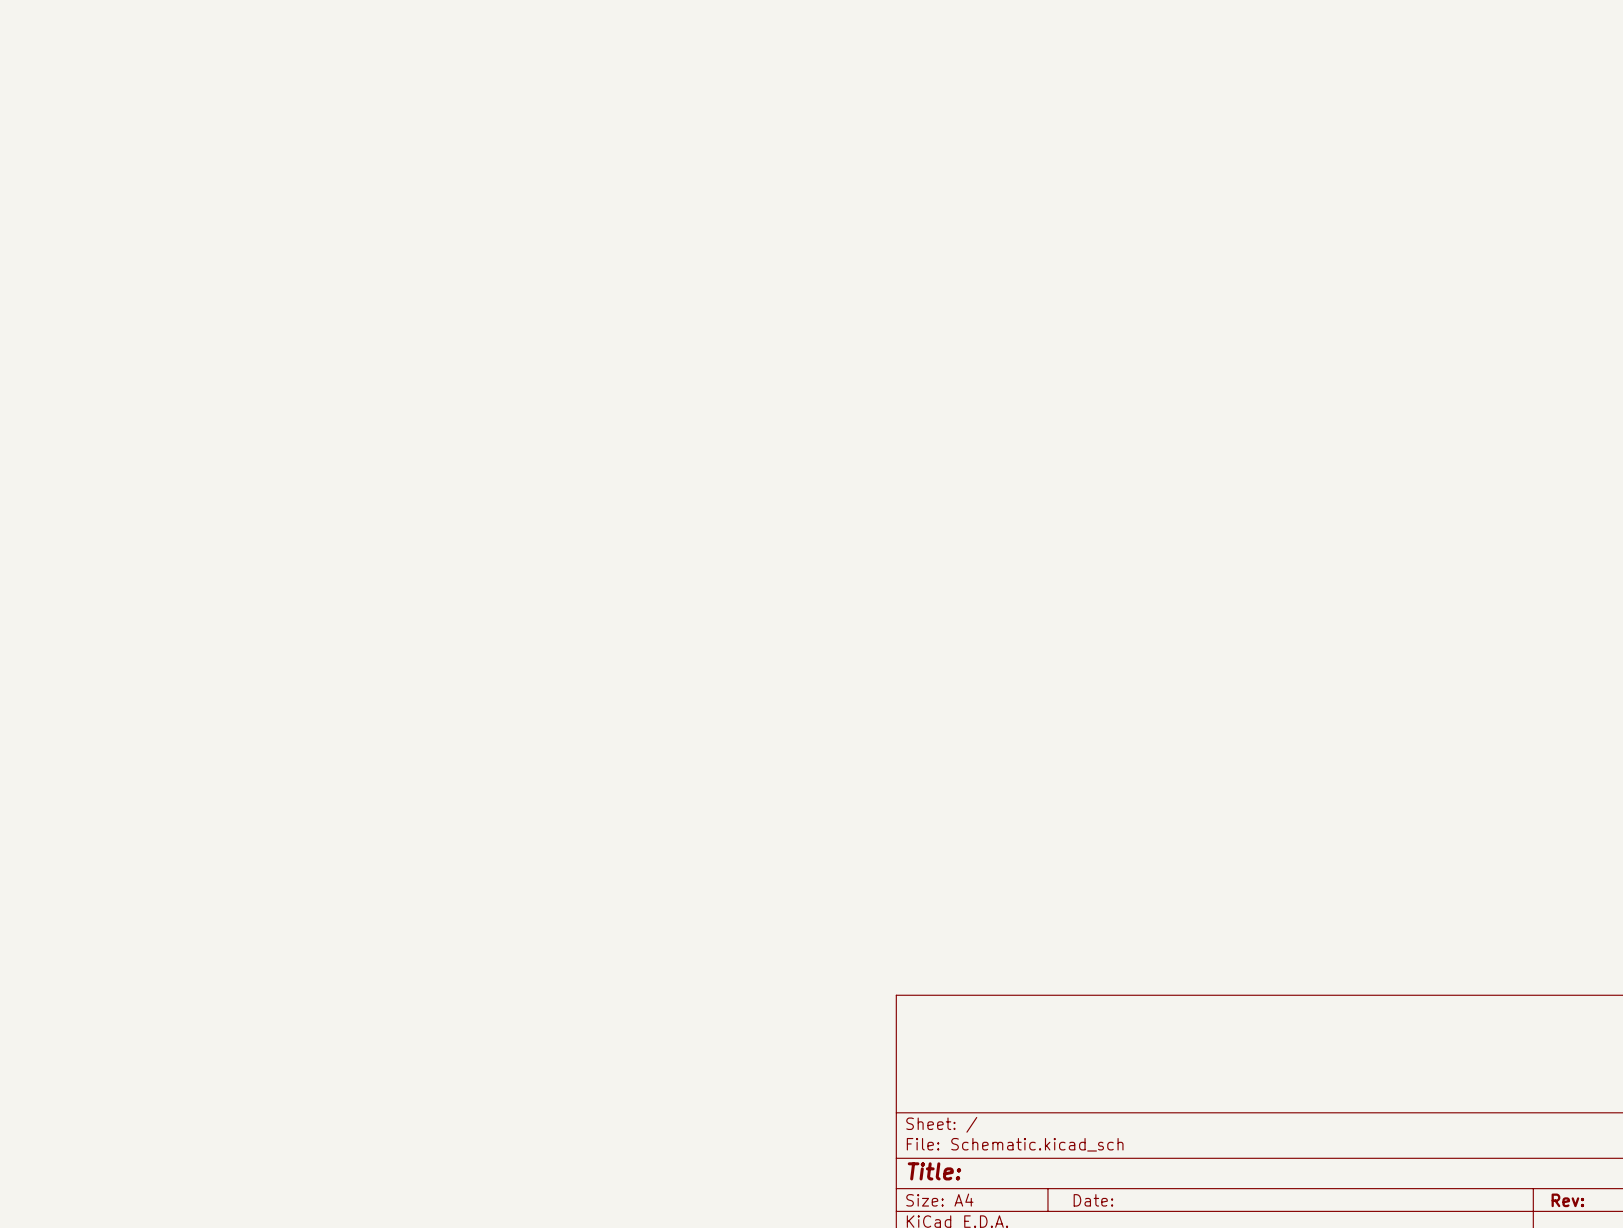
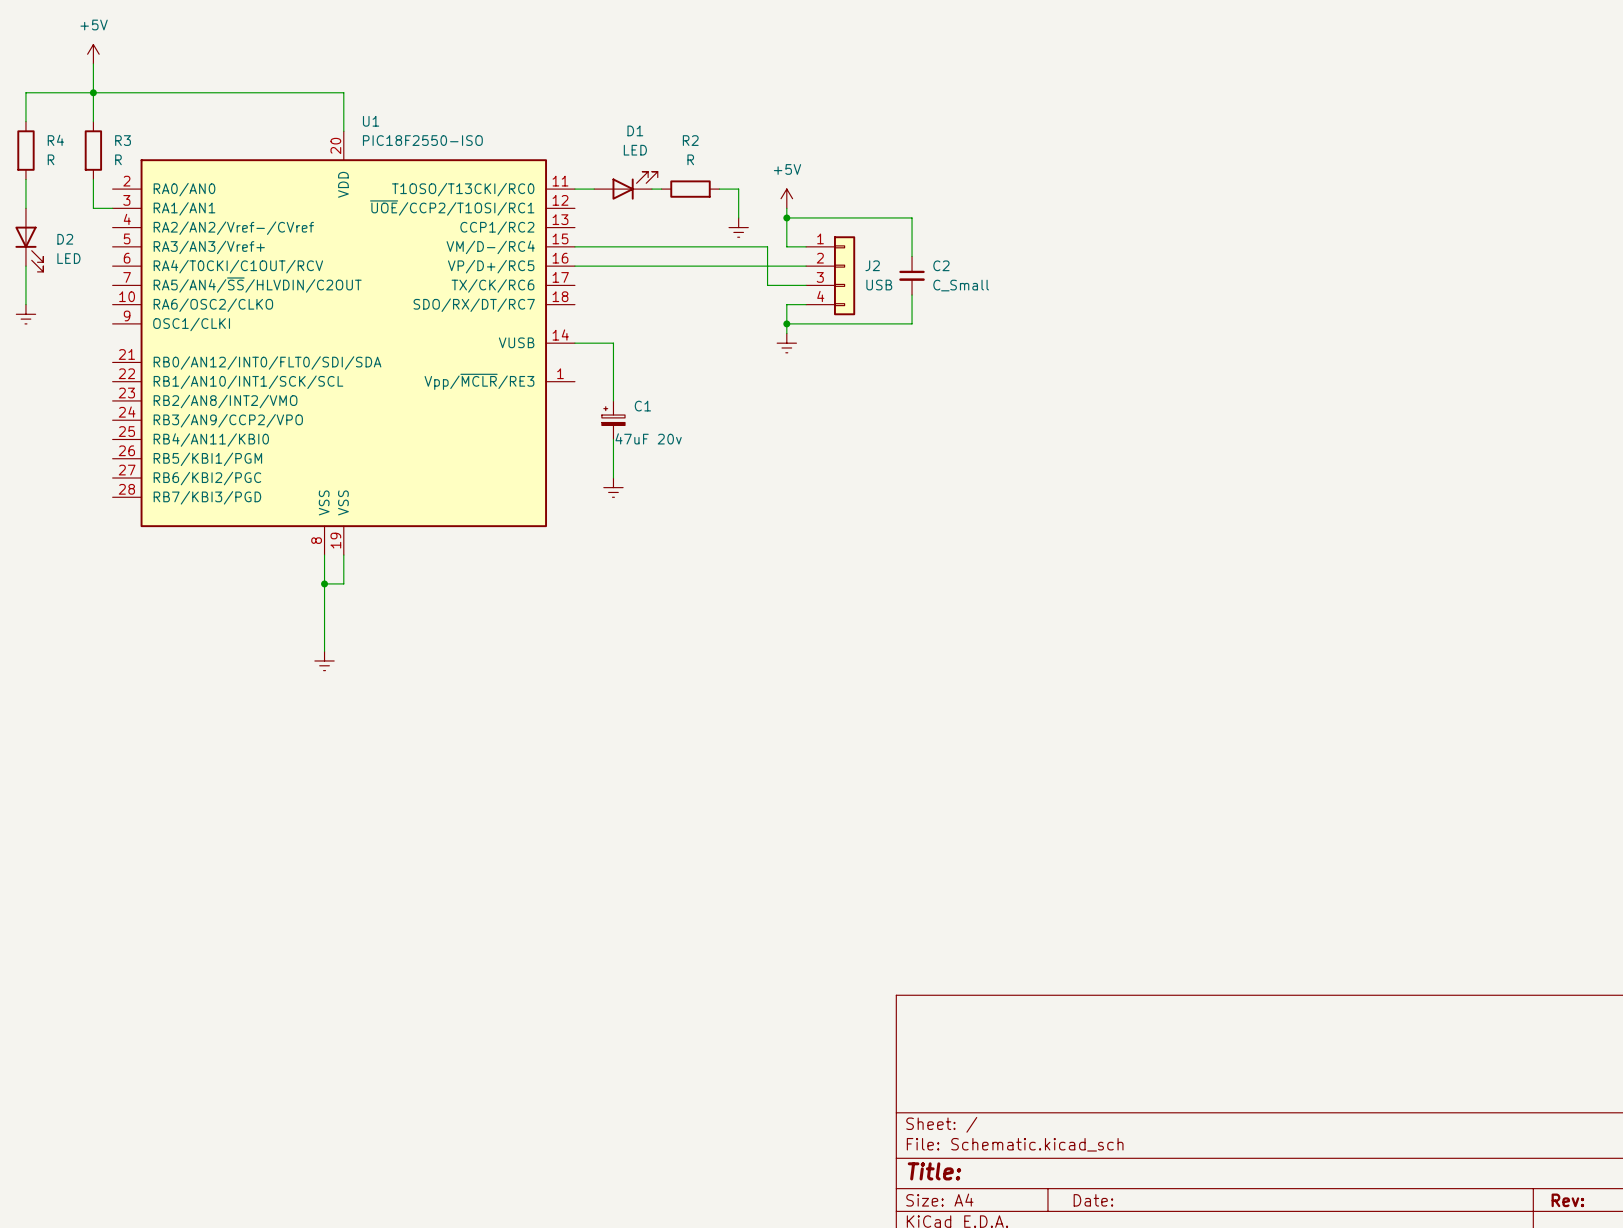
power symbol: none -> +5V (93, 54)
wire: none -> (93, 63) (93, 121)
junction: none -> (93, 92)
wire: none -> (25, 121) (25, 92) (343, 92) (343, 131)
R4: none -> R (25, 150)
R3: none -> R (93, 150)
wire: none -> (25, 179) (25, 208)
wire: none -> (93, 179) (93, 208) (112, 208)
D1: none -> LED (625, 185)
wire: none -> (574, 189) (594, 189)
wire: none -> (651, 189) (661, 189)
R2: none -> R (690, 189)
wire: none -> (719, 189) (738, 189) (738, 217)
power symbol: none -> +5V (786, 198)
wire: none -> (786, 208) (786, 246) (806, 246)
wire: none -> (786, 217) (912, 217) (912, 256)
junction: none -> (786, 217)
power symbol: none -> (738, 227)
D2: none -> LED (29, 240)
wire: none -> (574, 246) (767, 246) (767, 285) (806, 285)
wire: none -> (25, 266) (25, 304)
wire: none -> (574, 266) (806, 266)
J2: none -> USB (830, 275)
C2: none -> C_Small (912, 275)
wire: none -> (912, 295) (912, 323) (786, 323)
wire: none -> (806, 304) (786, 304) (786, 333)
power symbol: none -> (25, 314)
junction: none -> (786, 323)
U1: none -> PIC18F2550-ISO (343, 343)
wire: none -> (574, 343) (613, 343) (613, 400)
power symbol: none -> (786, 343)
C1: none -> 47uF 20v (613, 420)
wire: none -> (613, 439) (613, 478)
power symbol: none -> (613, 487)
wire: none -> (324, 555) (324, 651)
wire: none -> (343, 555) (343, 583) (324, 583)
junction: none -> (324, 583)
power symbol: none -> (324, 660)

